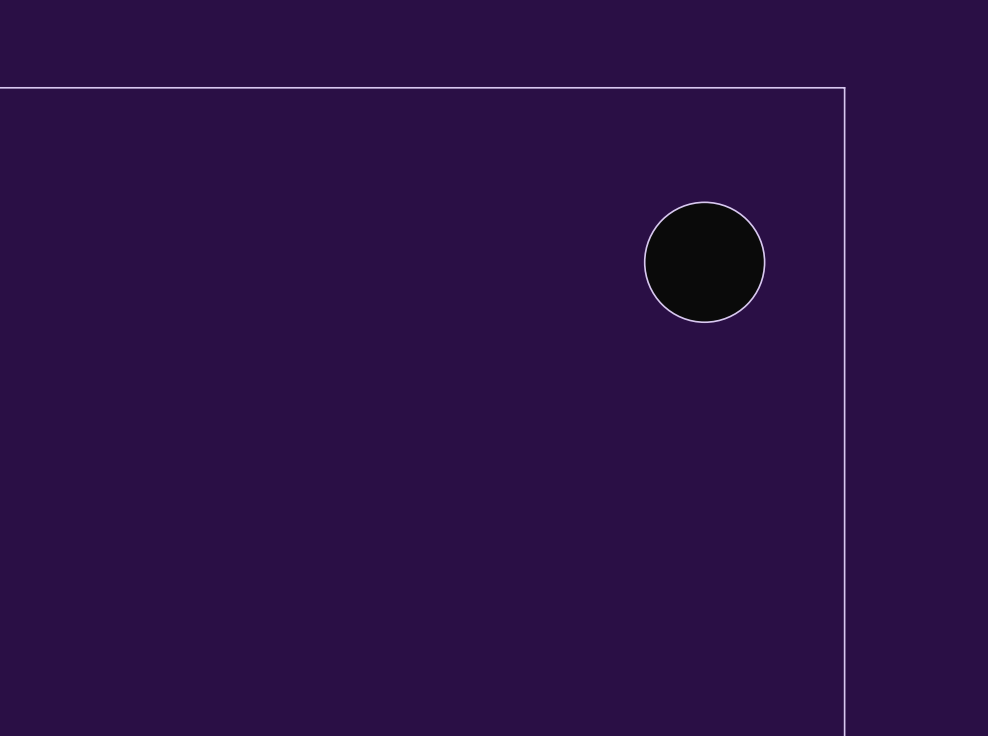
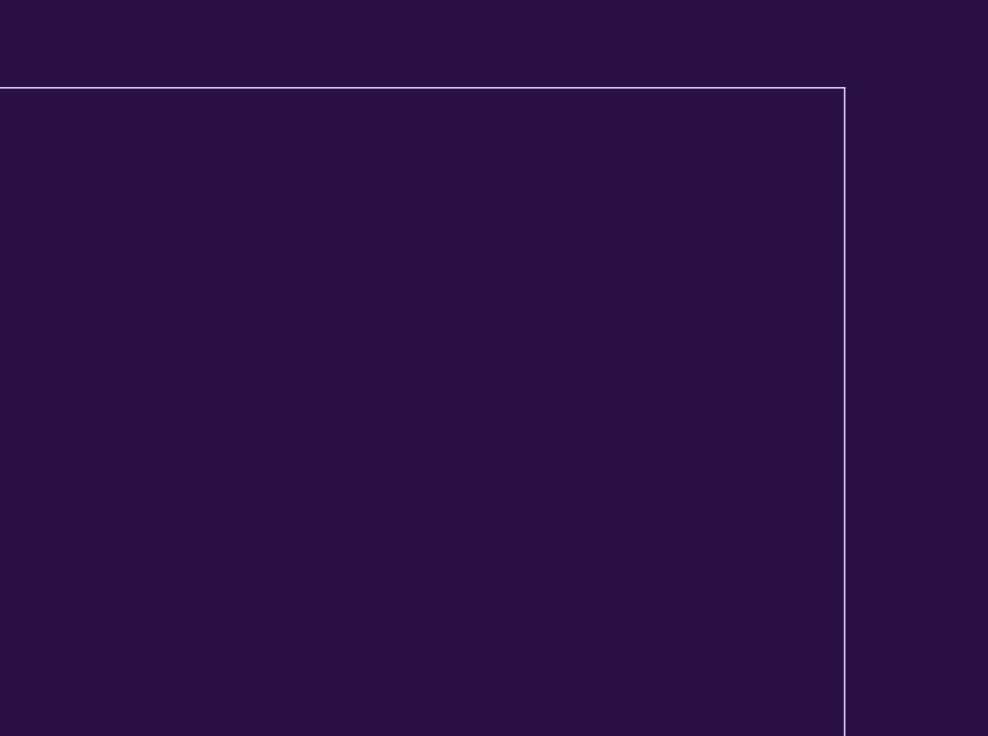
part: (704, 262) -> none

